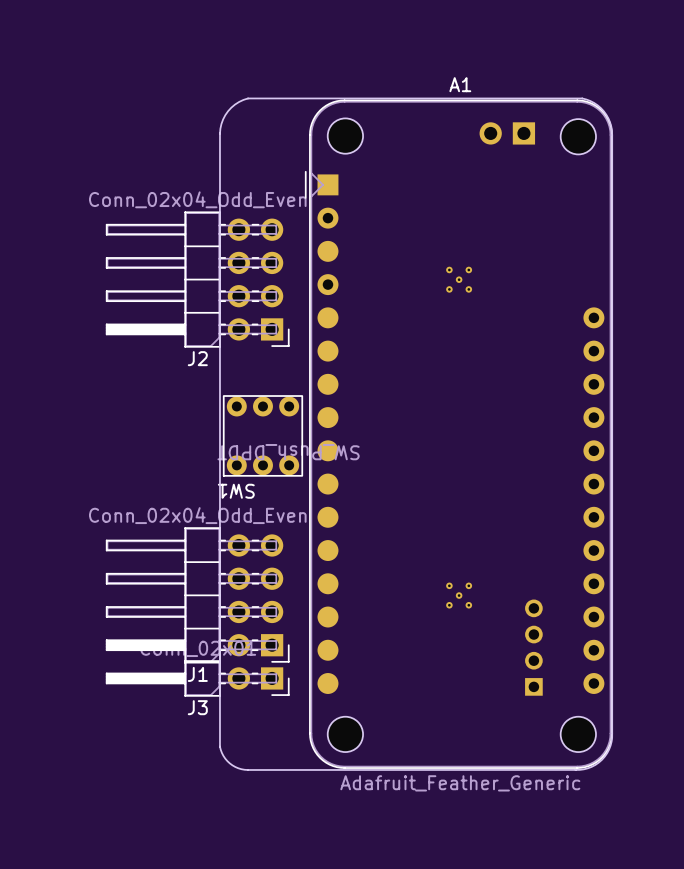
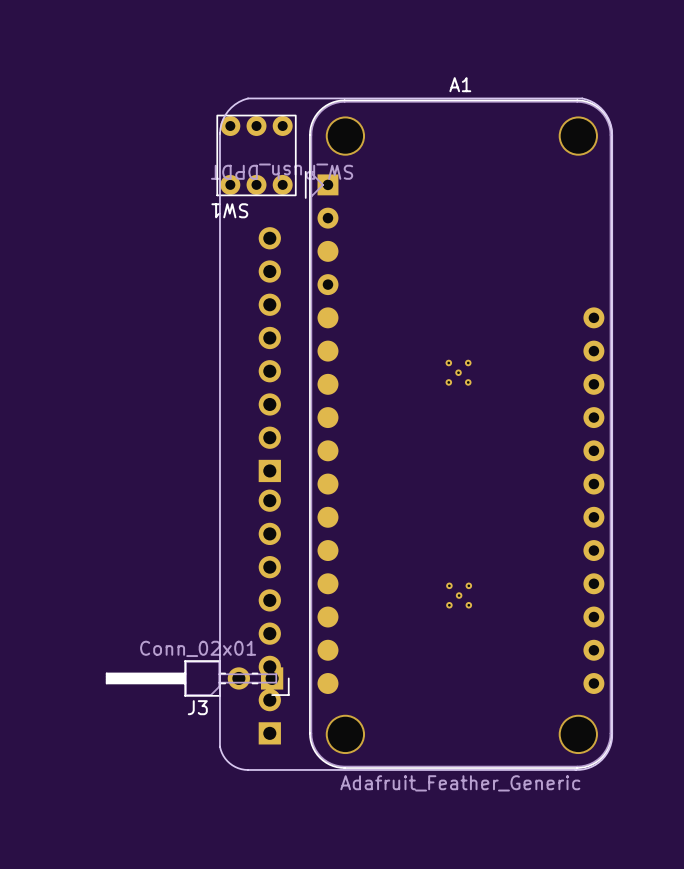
A1 footprint: [304, 99, 613, 769] -> [304, 99, 613, 769]
part: (507, 133) -> none
part: (345, 136) -> none
via: none -> (345, 136)
part: (578, 136) -> none
via: none -> (578, 136)
J2: Conn_02x04_Odd_Even (197, 279) -> none
part position: (459, 279) -> (458, 372)
part: none -> (269, 354)
SW1 position: (262, 435) -> (256, 155)
J1: Conn_02x04_Odd_Even (197, 595) -> none
part: none -> (269, 617)
part: (533, 647) -> none
part: (345, 734) -> none
via: none -> (345, 734)
part: (578, 734) -> none
via: none -> (578, 734)

